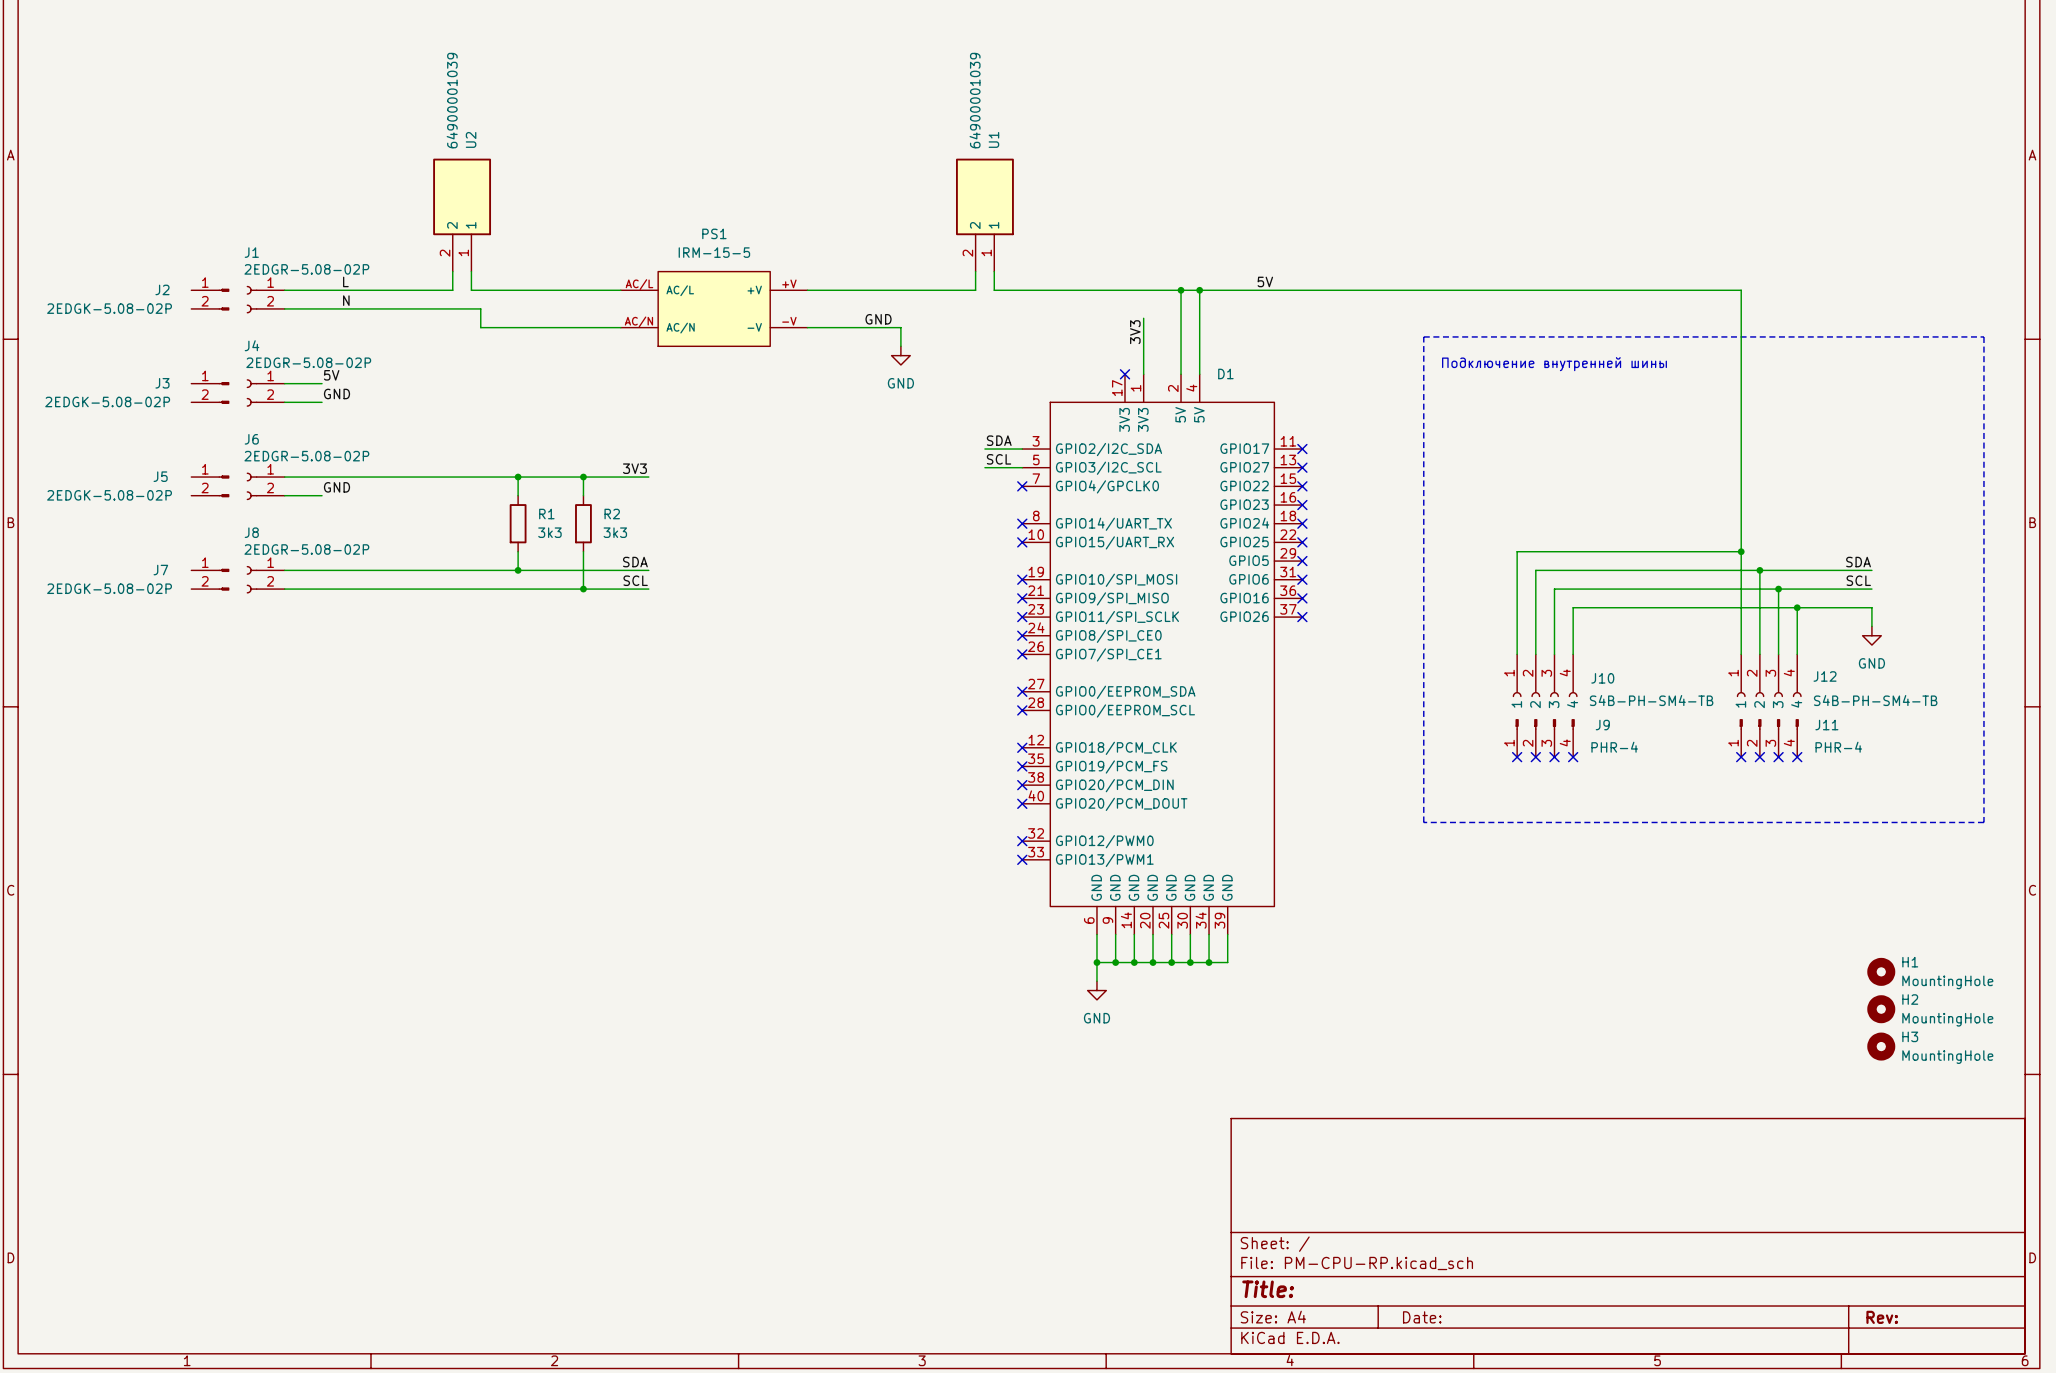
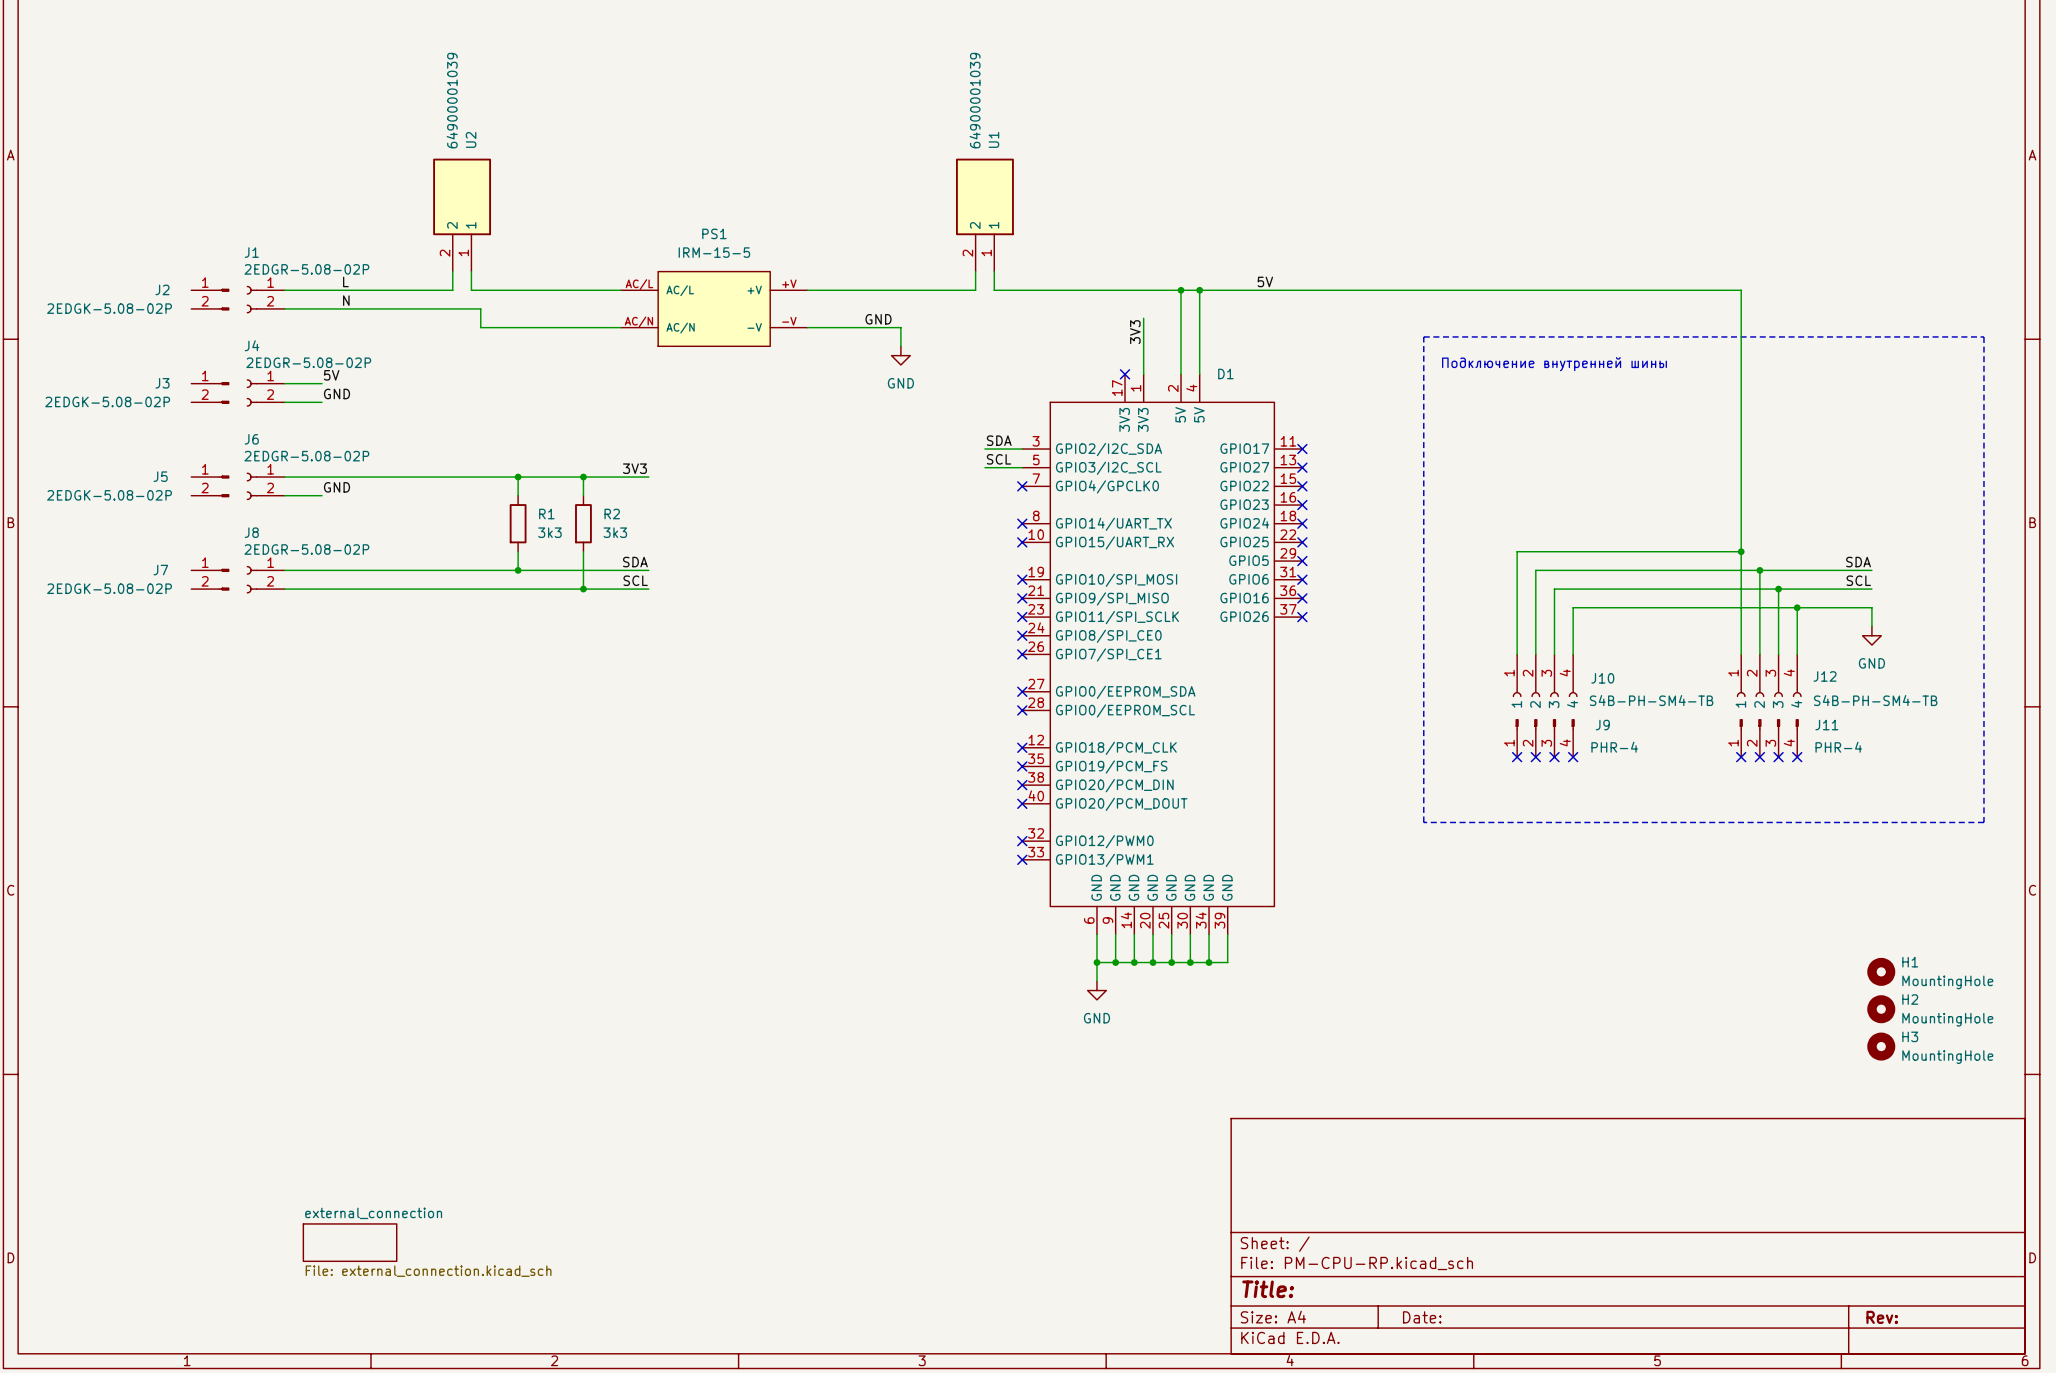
sheet external_connection: none -> File: external_connection.kicad_sch (350, 1242)

